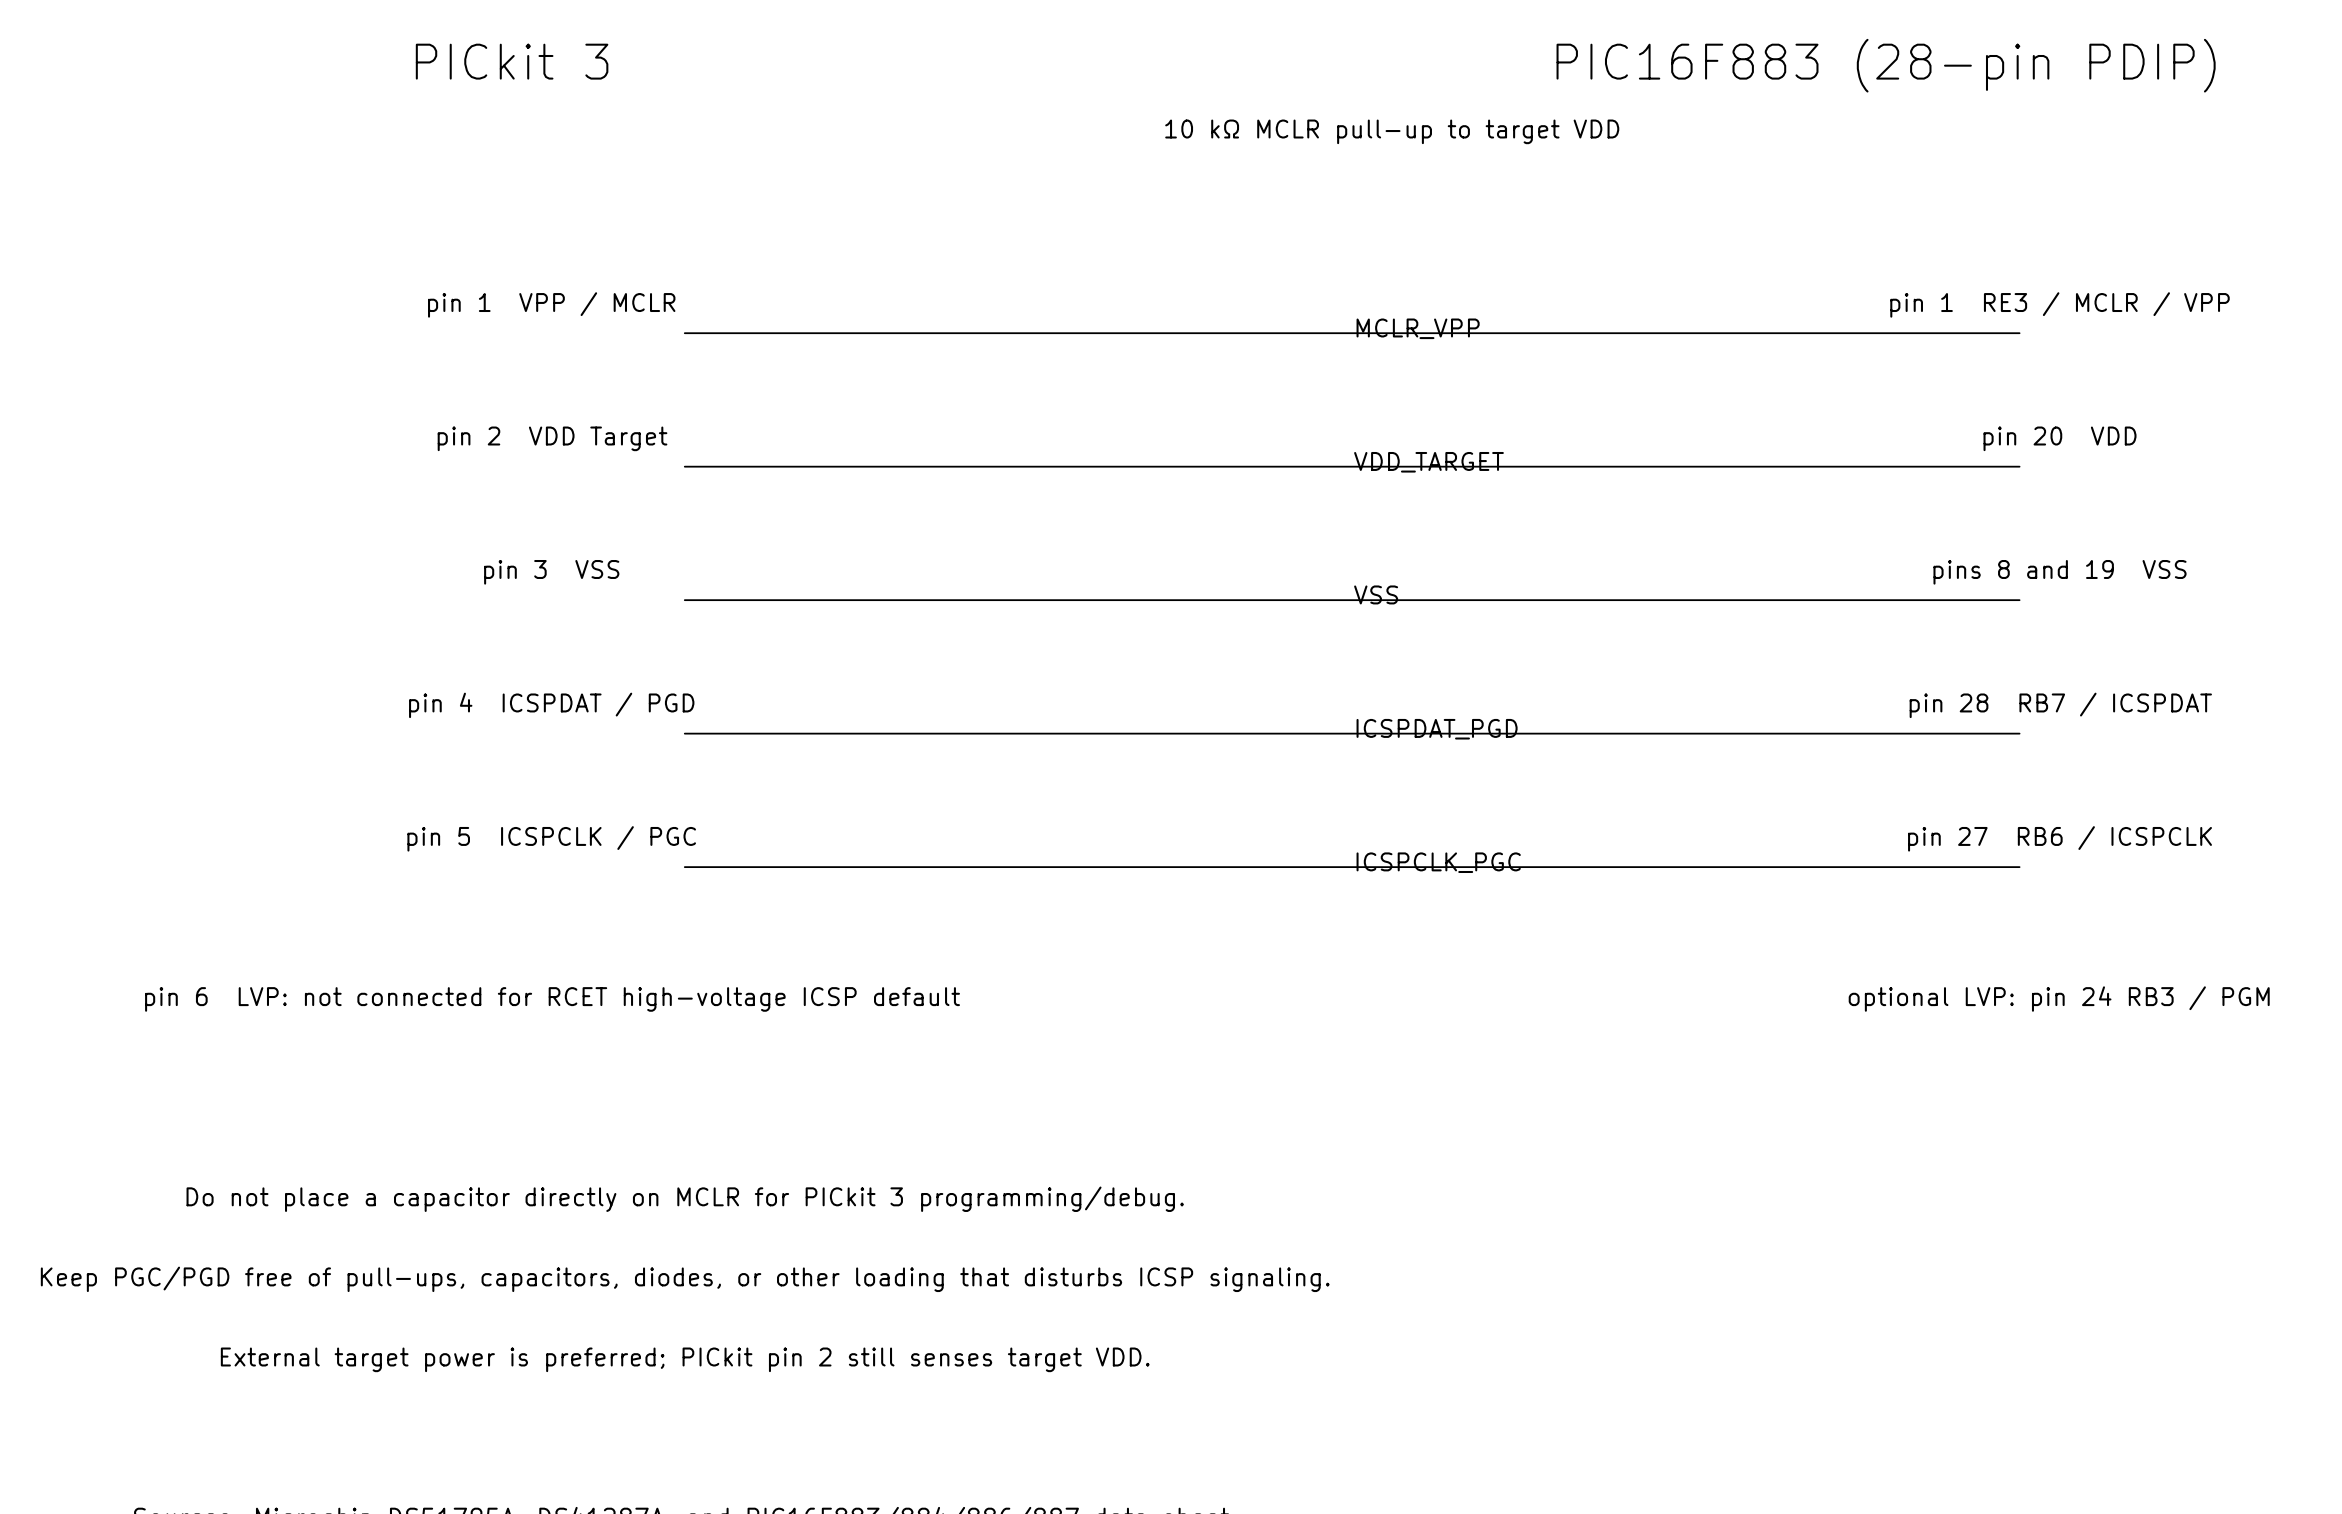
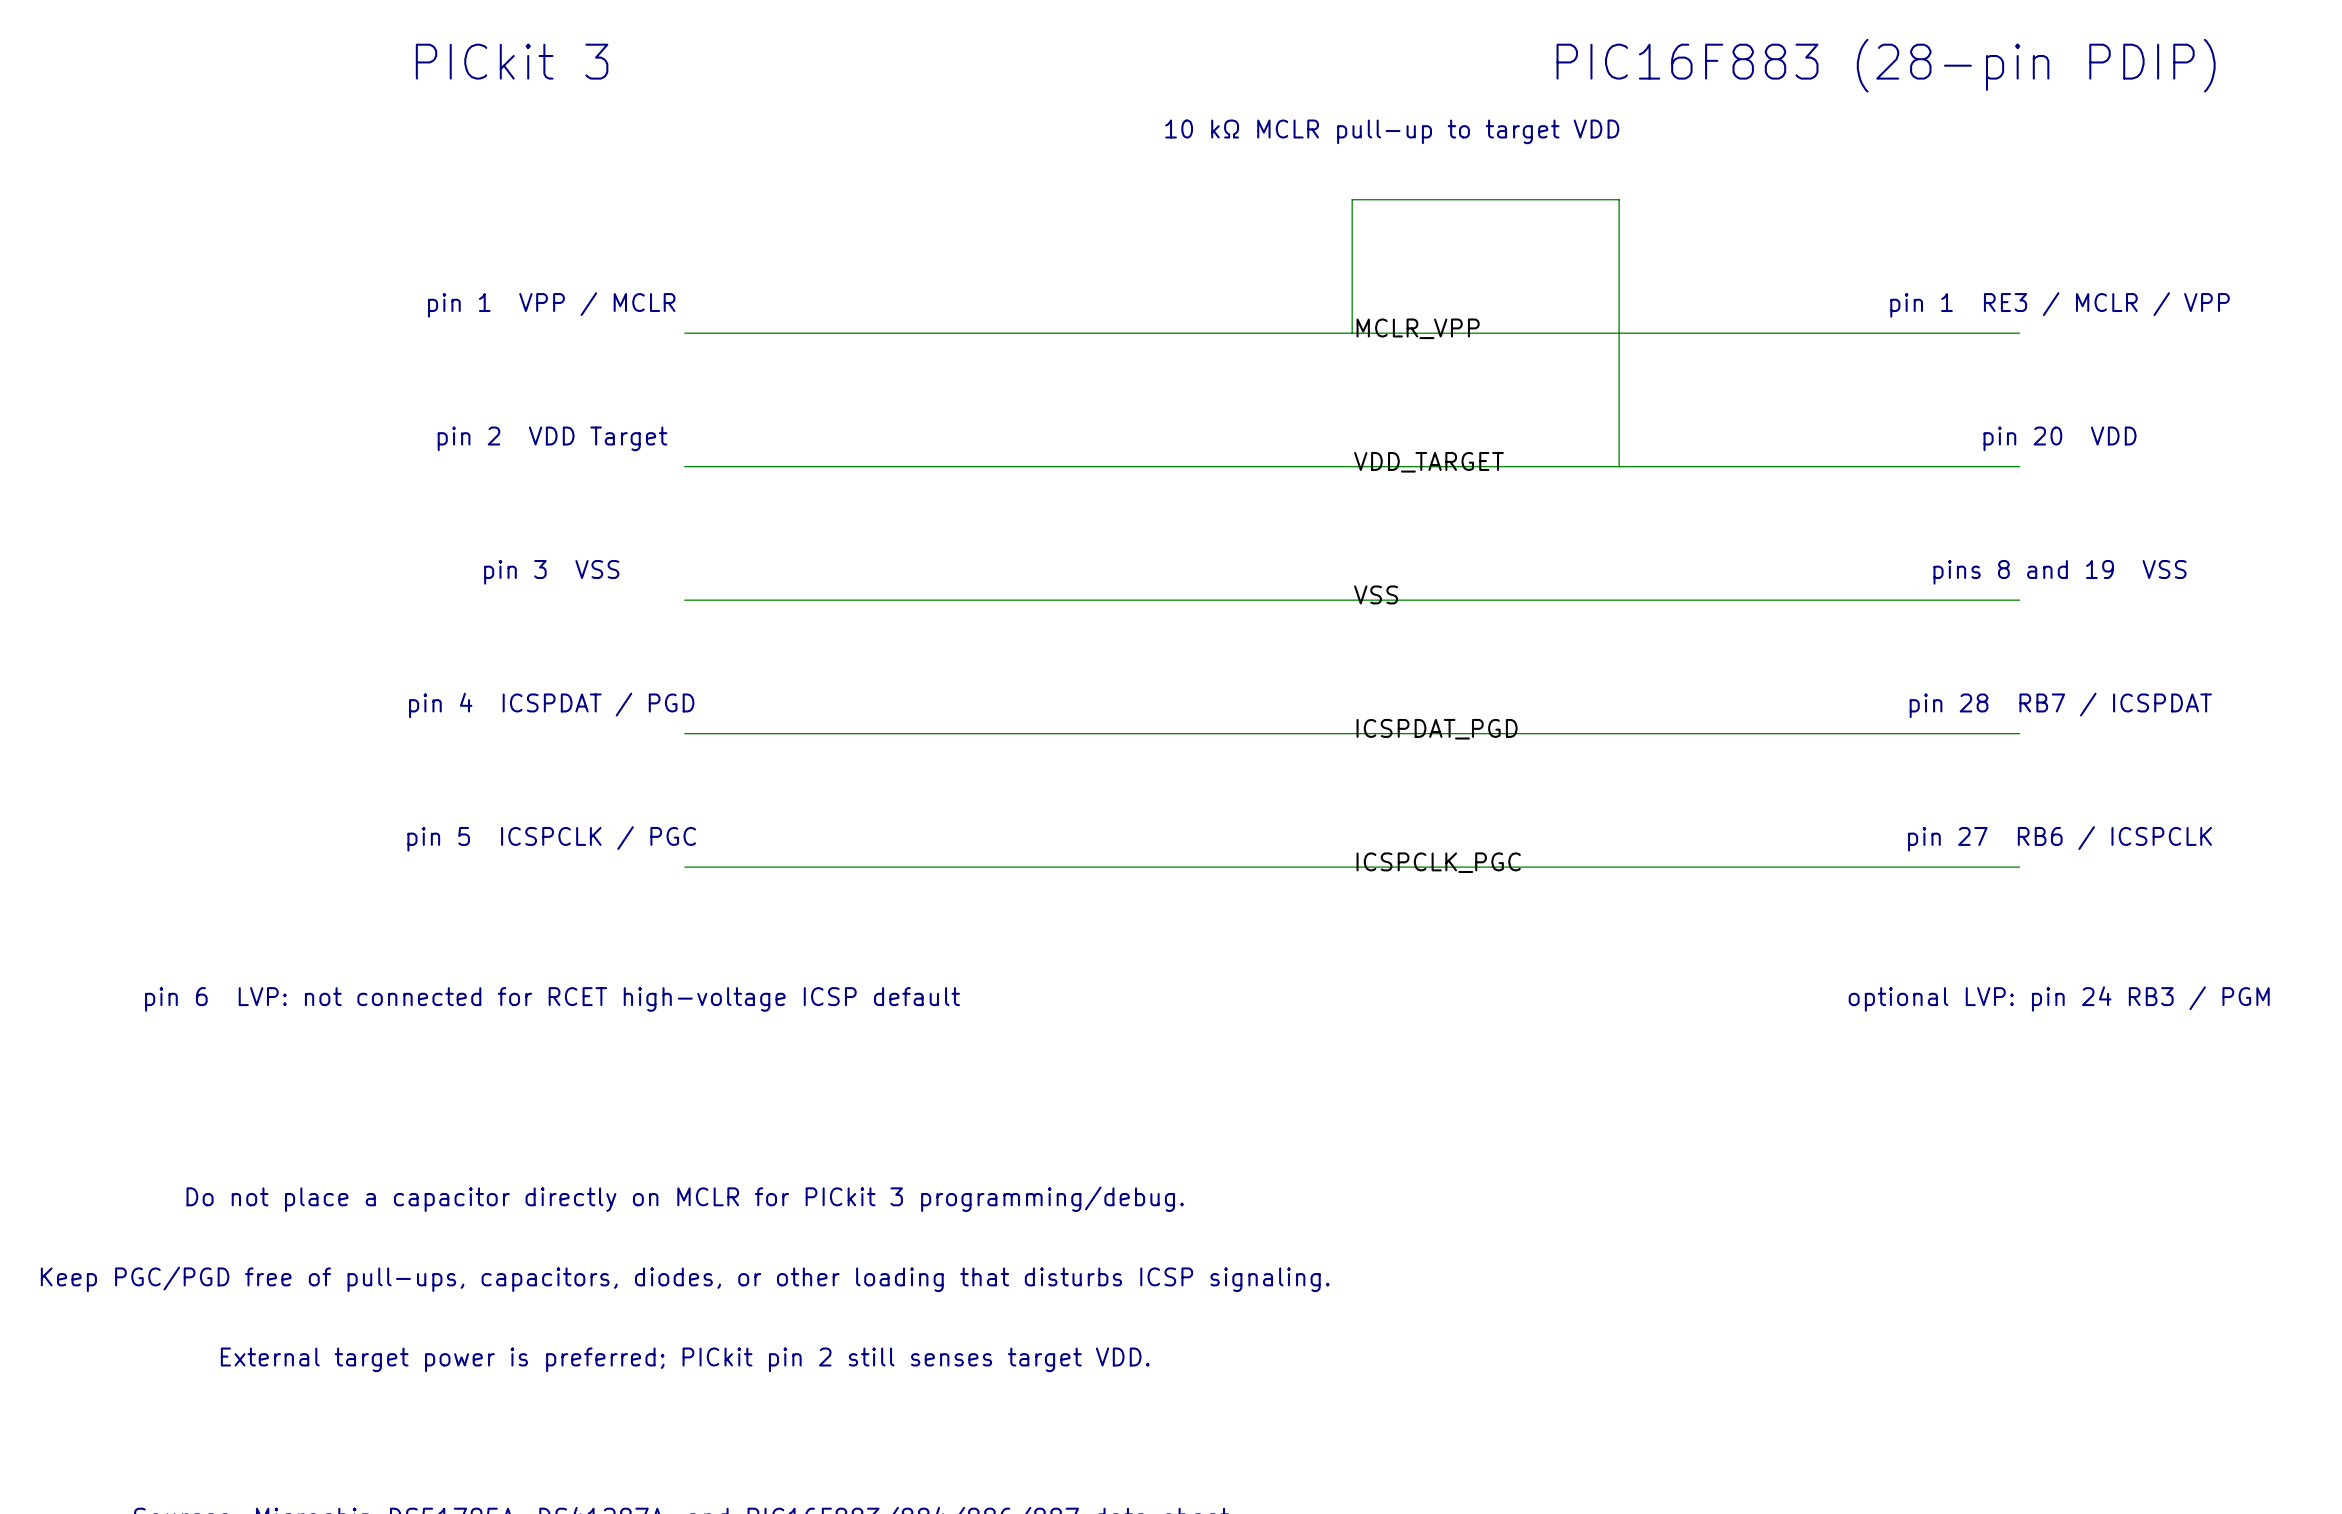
wire: none -> (1352, 333) (1352, 199) (1619, 199) (1619, 466)

